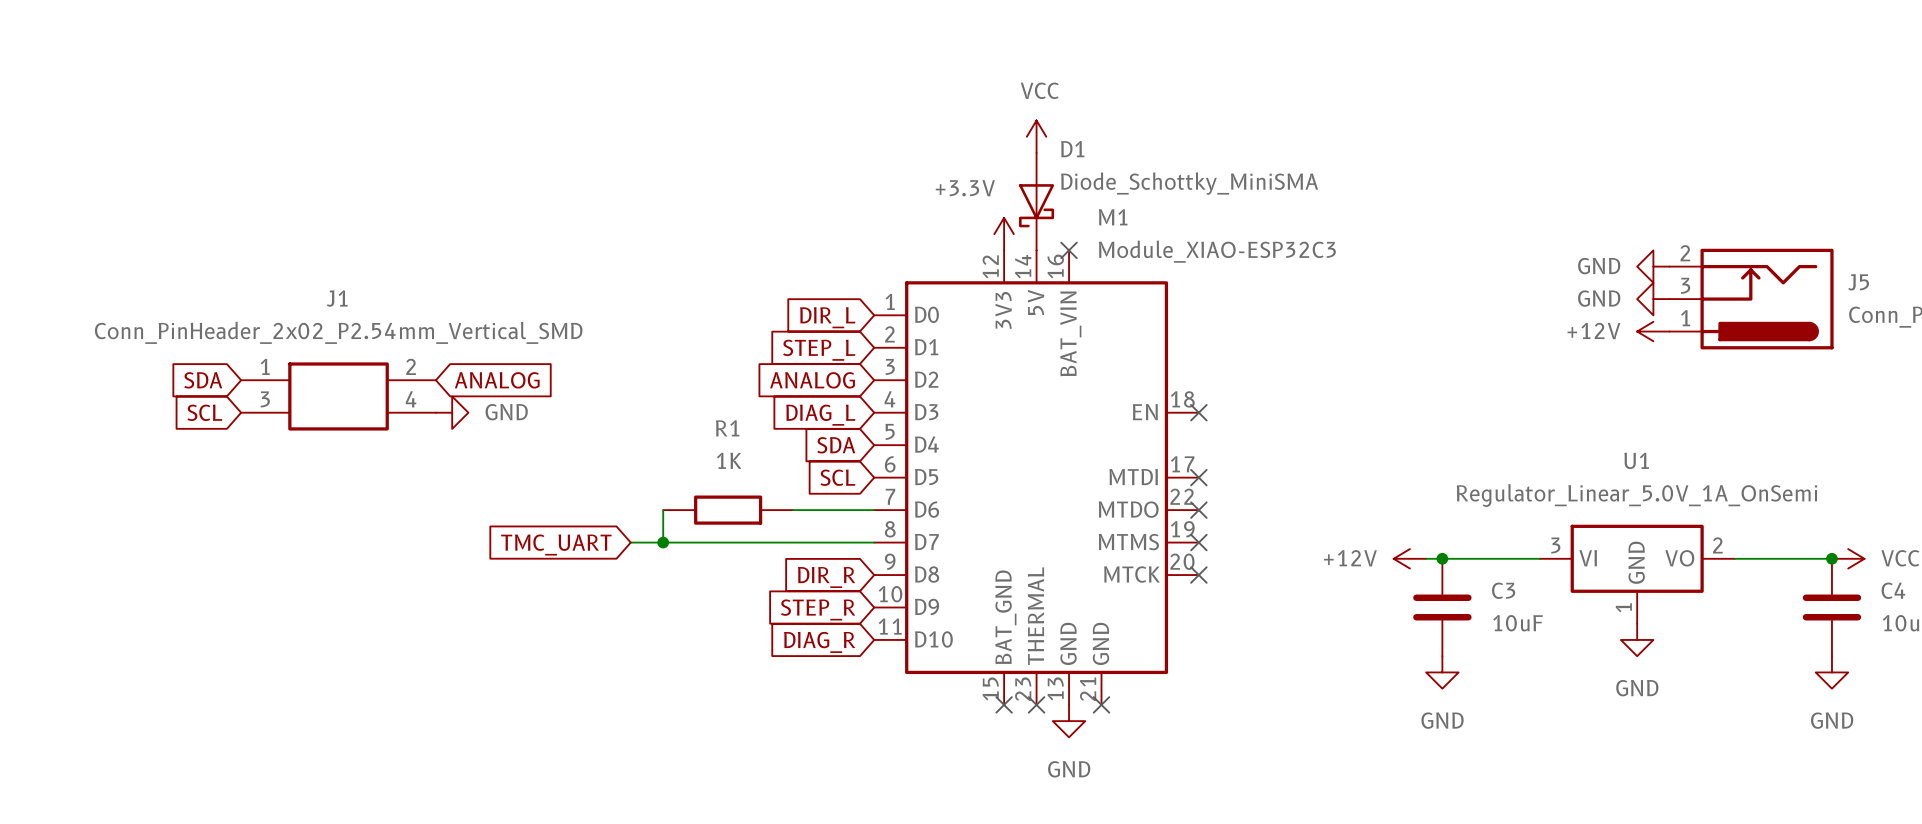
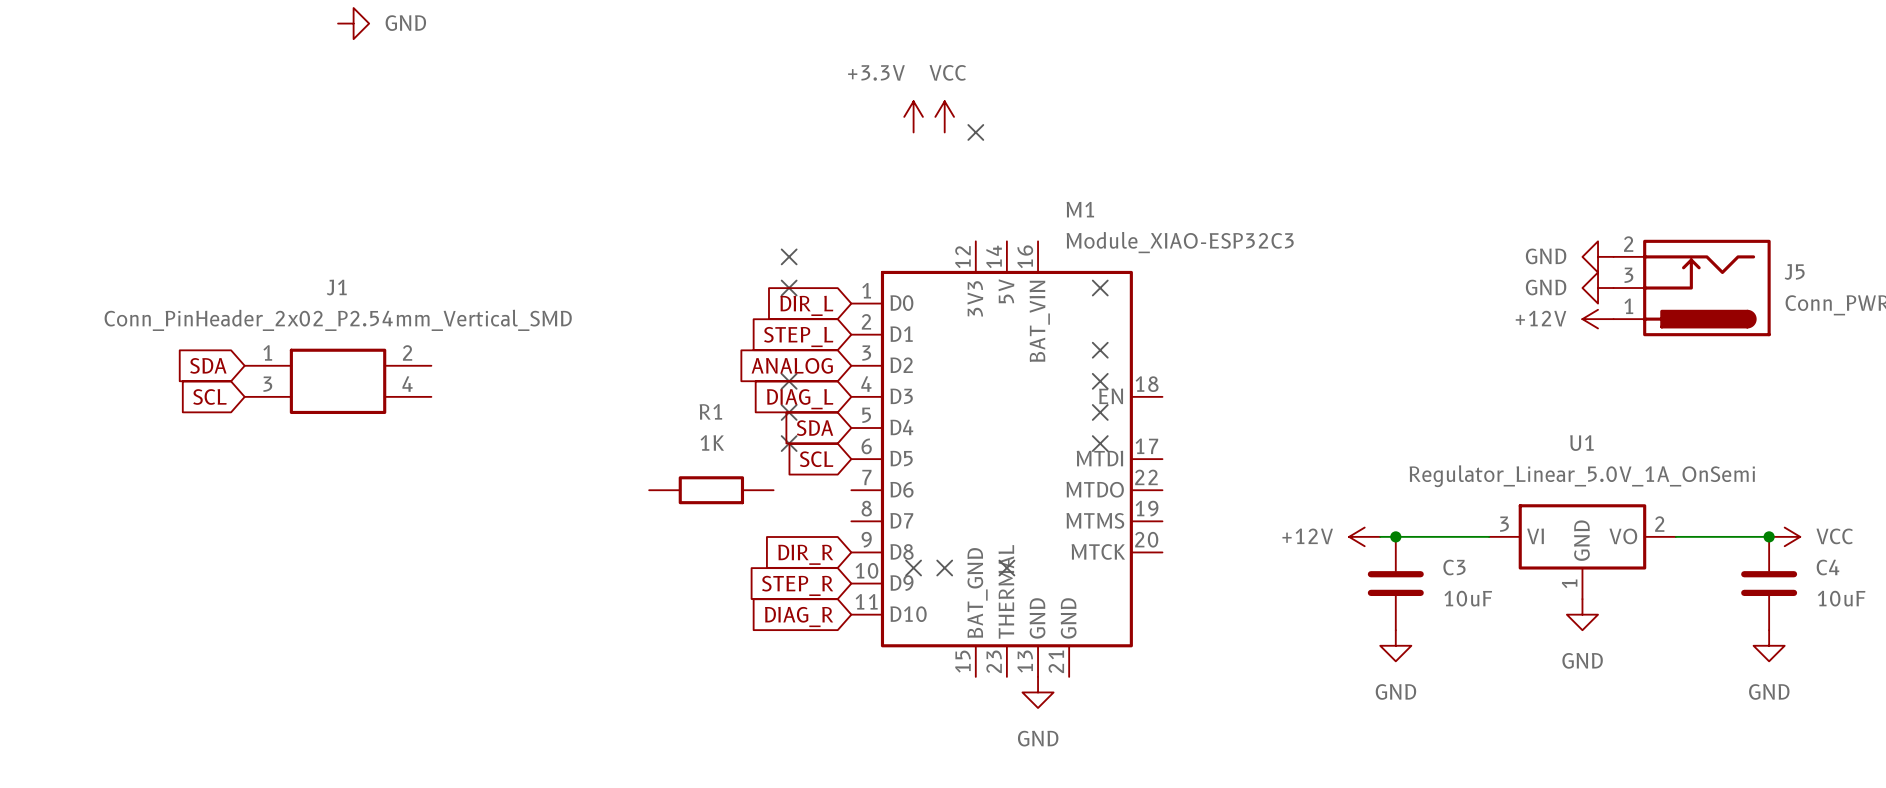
power symbol: none -> GND (353, 23)
no-connect mark: none -> (975, 132)
power symbol position: VCC (1036, 136) -> VCC (944, 116)
D1: Diode_Schottky_MiniSMA (1036, 201) -> none
power symbol position: +3.3V (1004, 234) -> +3.3V (913, 116)
no-connect mark: (1069, 250) -> none
no-connect mark: none -> (789, 256)
no-connect mark: none -> (789, 288)
no-connect mark: none -> (1100, 288)
no-connect mark: none -> (1100, 350)
global label: ANALOG (497, 380) -> none
no-connect mark: none -> (789, 381)
no-connect mark: none -> (1100, 381)
power symbol: GND (452, 412) -> none
no-connect mark: (1198, 412) -> none
no-connect mark: none -> (789, 412)
no-connect mark: none -> (1100, 412)
no-connect mark: none -> (789, 443)
no-connect mark: none -> (1100, 443)
no-connect mark: (1198, 477) -> none
wire: (663, 510) (663, 542) -> none
wire: (793, 510) (874, 510) -> none
no-connect mark: (1198, 510) -> none
wire: (630, 542) (874, 542) -> none
junction: (663, 542) -> none
no-connect mark: (1198, 542) -> none
global label: TMC_UART (556, 545) -> none
no-connect mark: (1198, 575) -> none
no-connect mark: none -> (913, 568)
no-connect mark: none -> (944, 568)
no-connect mark: none -> (1006, 568)
no-connect mark: (1004, 704) -> none
no-connect mark: (1036, 704) -> none
no-connect mark: (1101, 704) -> none

